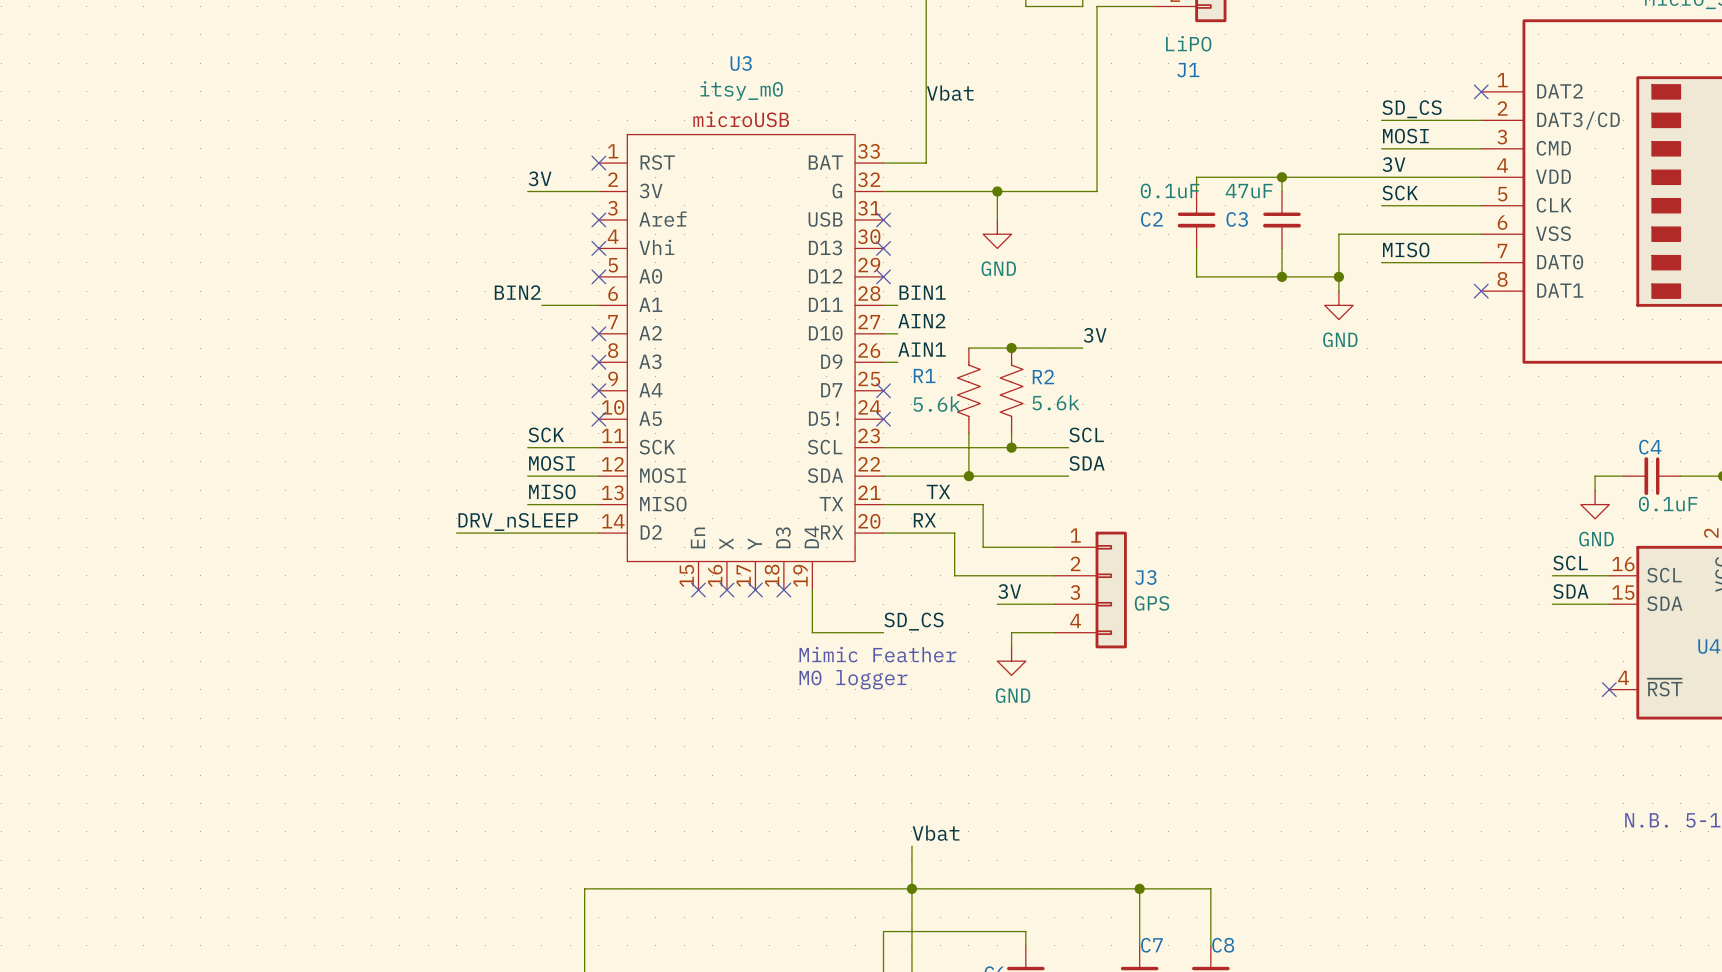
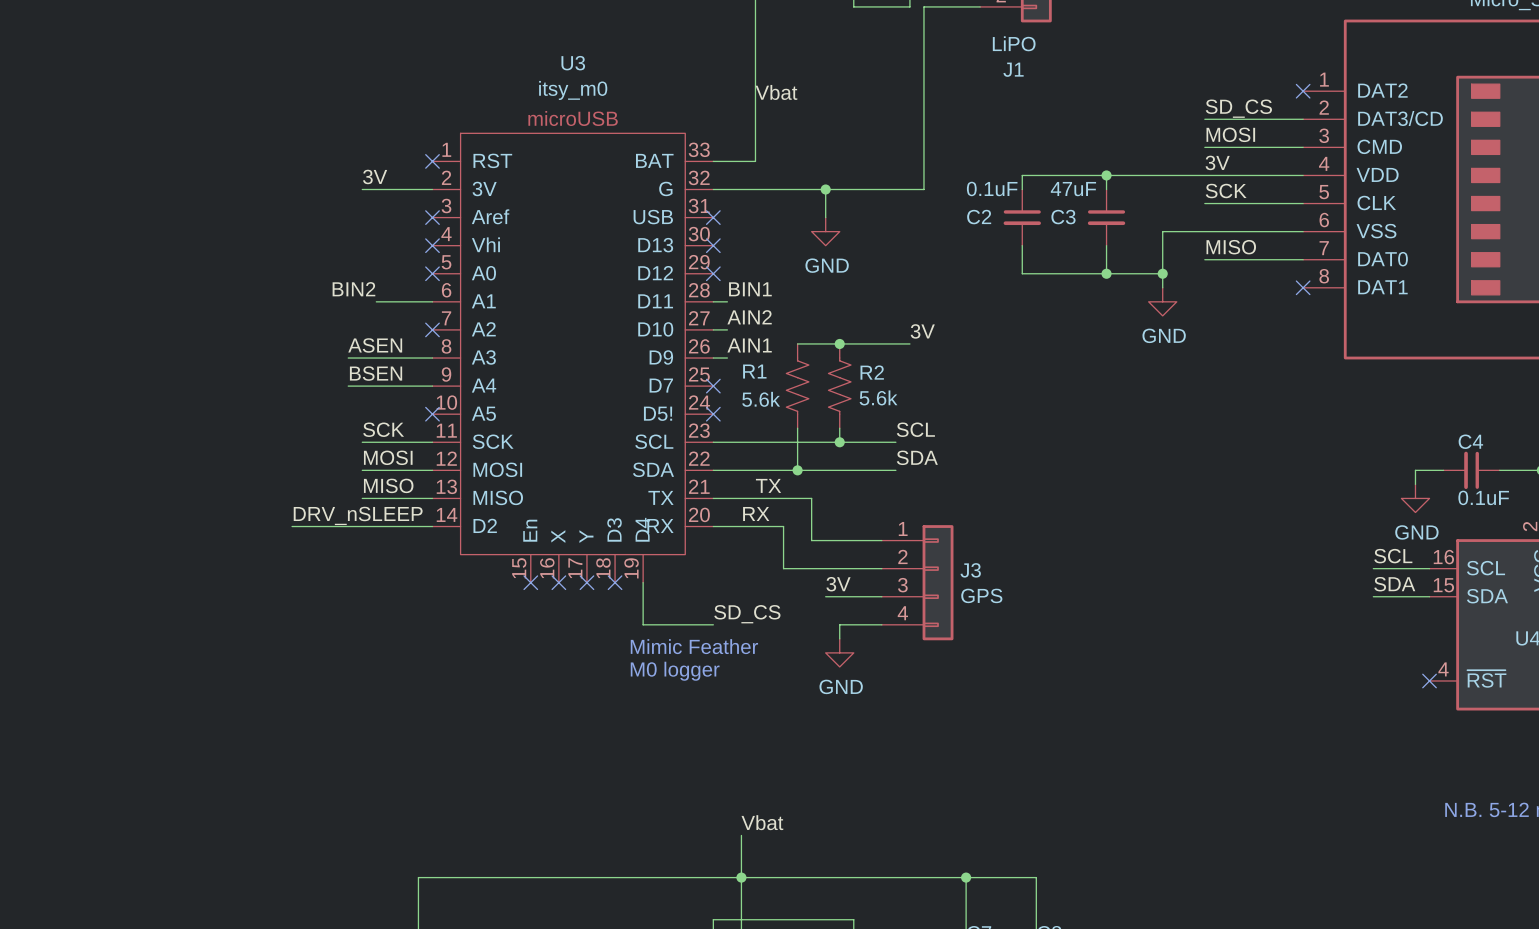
label: none -> ASEN (375, 345)
wire: none -> (348, 358) (432, 358)
no-connect mark: (598, 362) -> none
label: none -> BSEN (376, 373)
wire: none -> (348, 386) (432, 386)
no-connect mark: (598, 390) -> none

